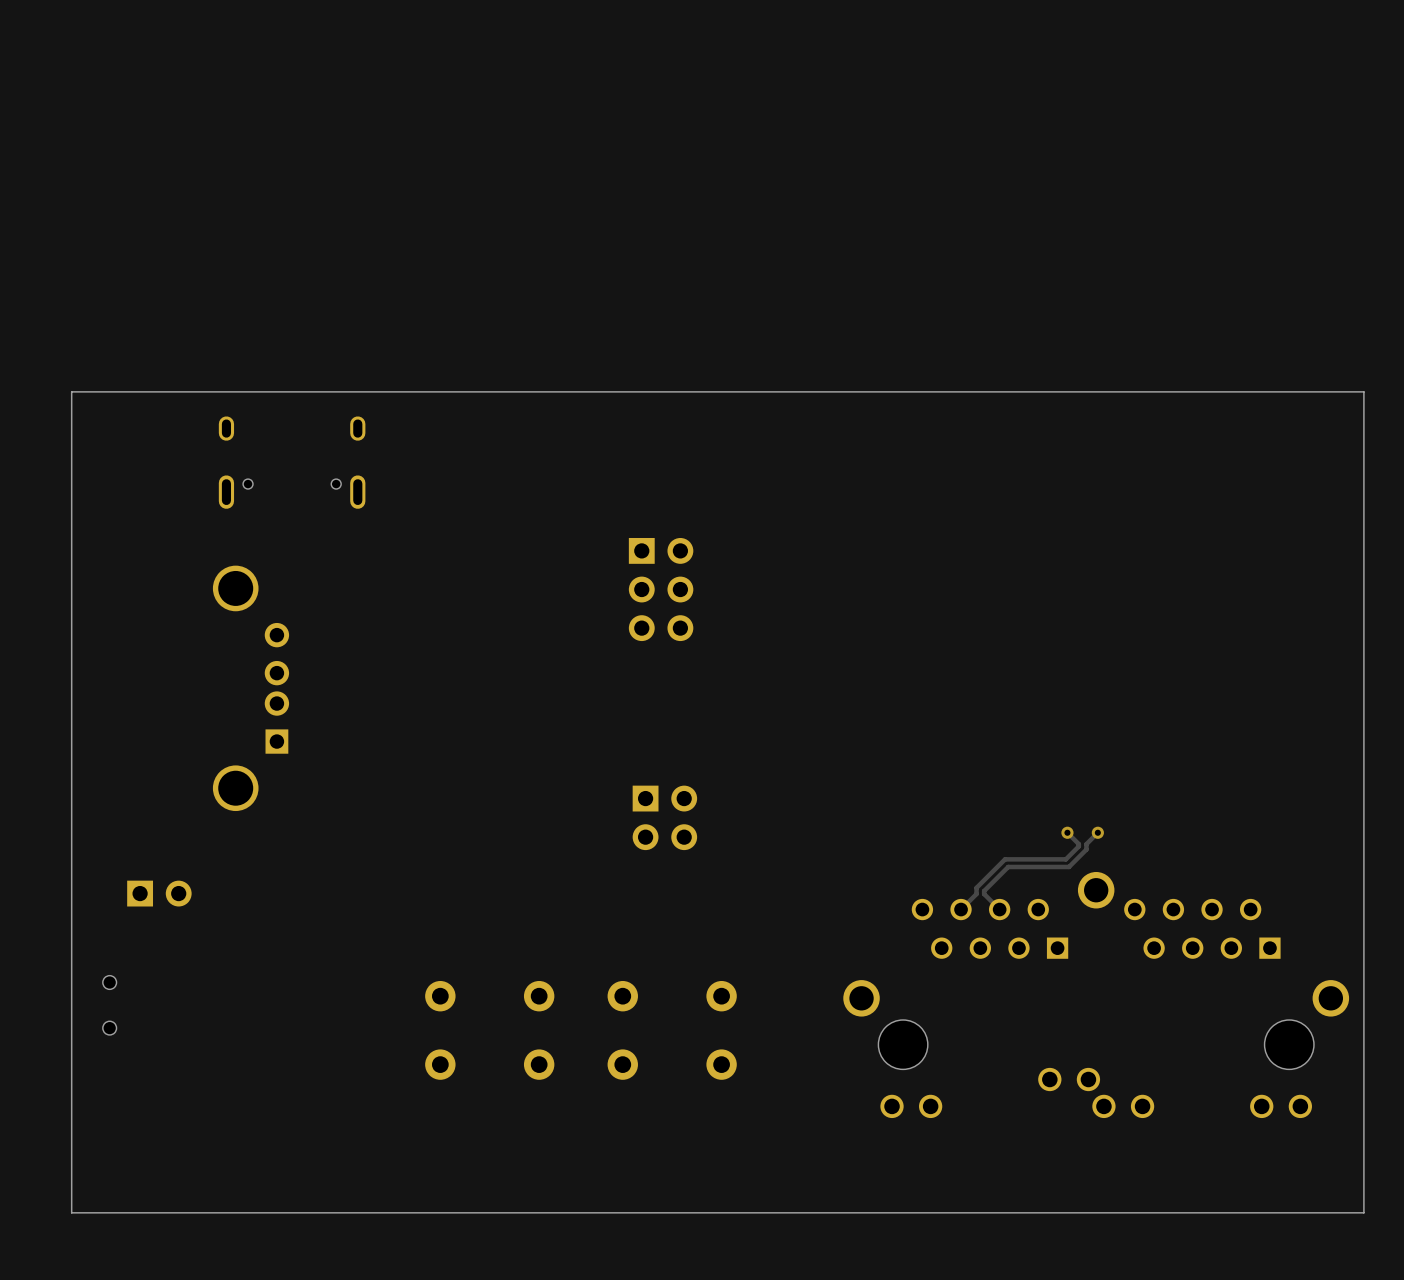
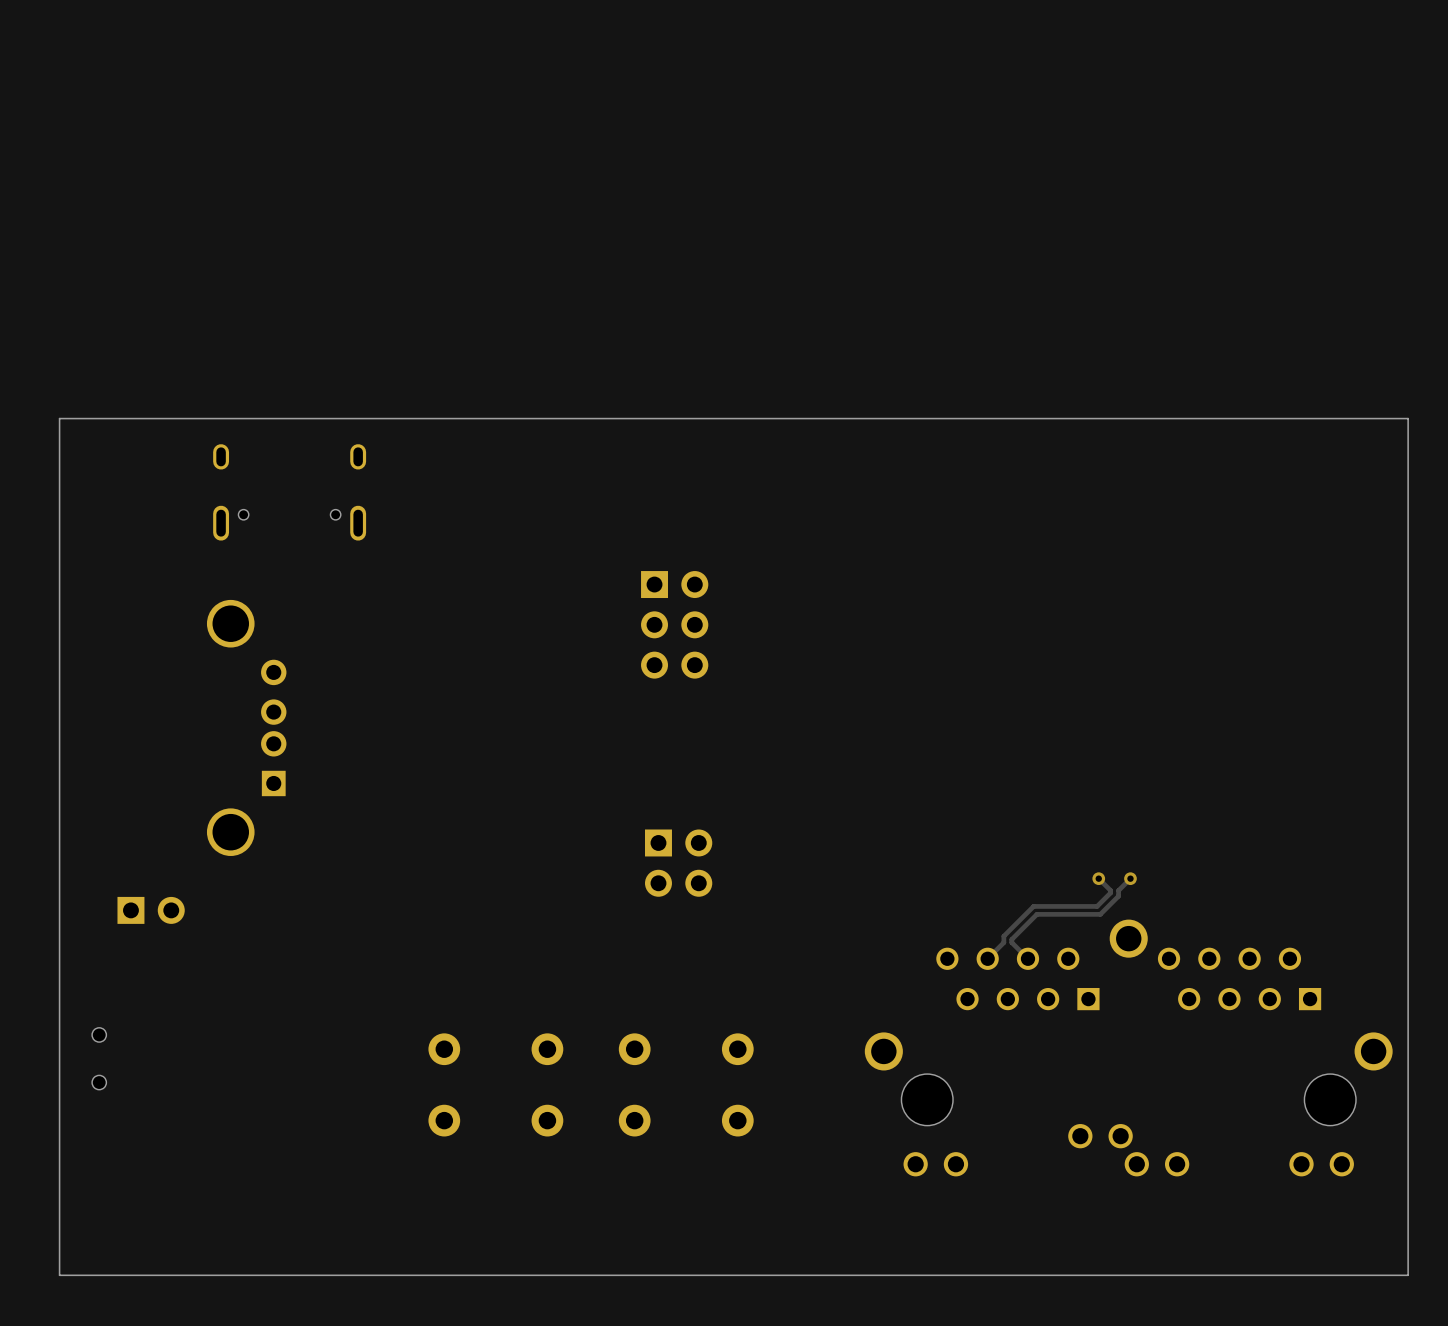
part position: (159, 893) -> (151, 910)

